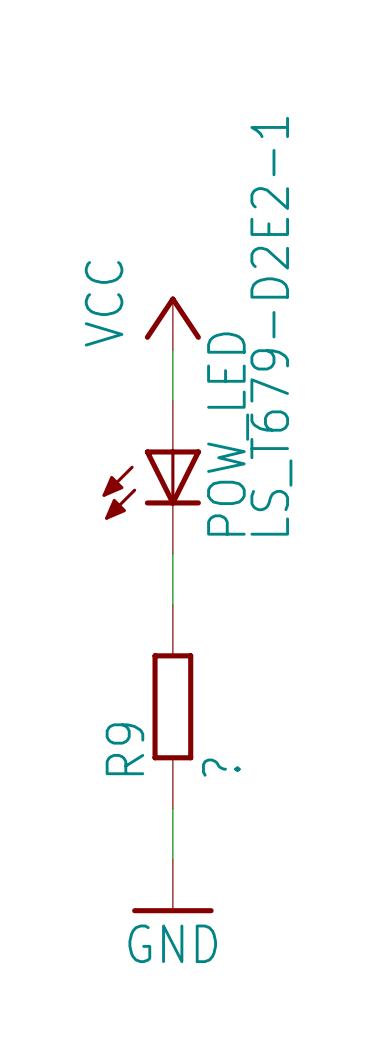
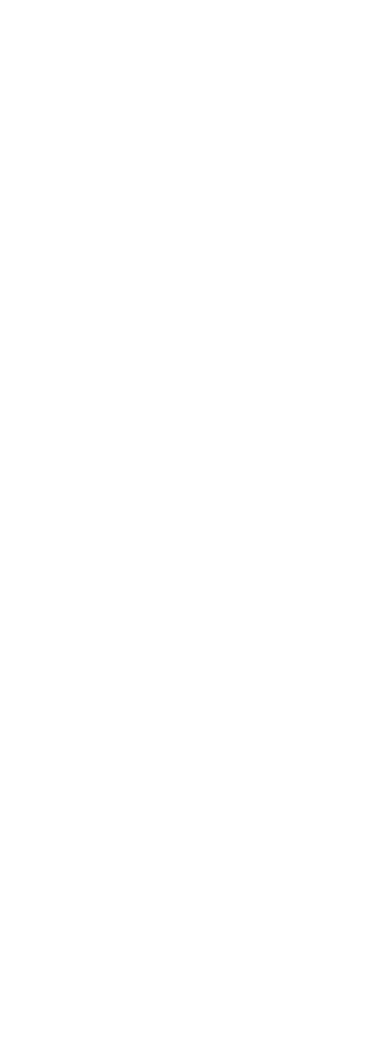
power symbol: VCC (172, 323) -> none
wire: (172, 350) (172, 401) -> none
POW_LED: LS_T679-D2E2-1 (151, 477) -> none
wire: (172, 553) (172, 604) -> none
R9: ? (172, 706) -> none
wire: (172, 808) (172, 859) -> none
power symbol: GND (172, 886) -> none

